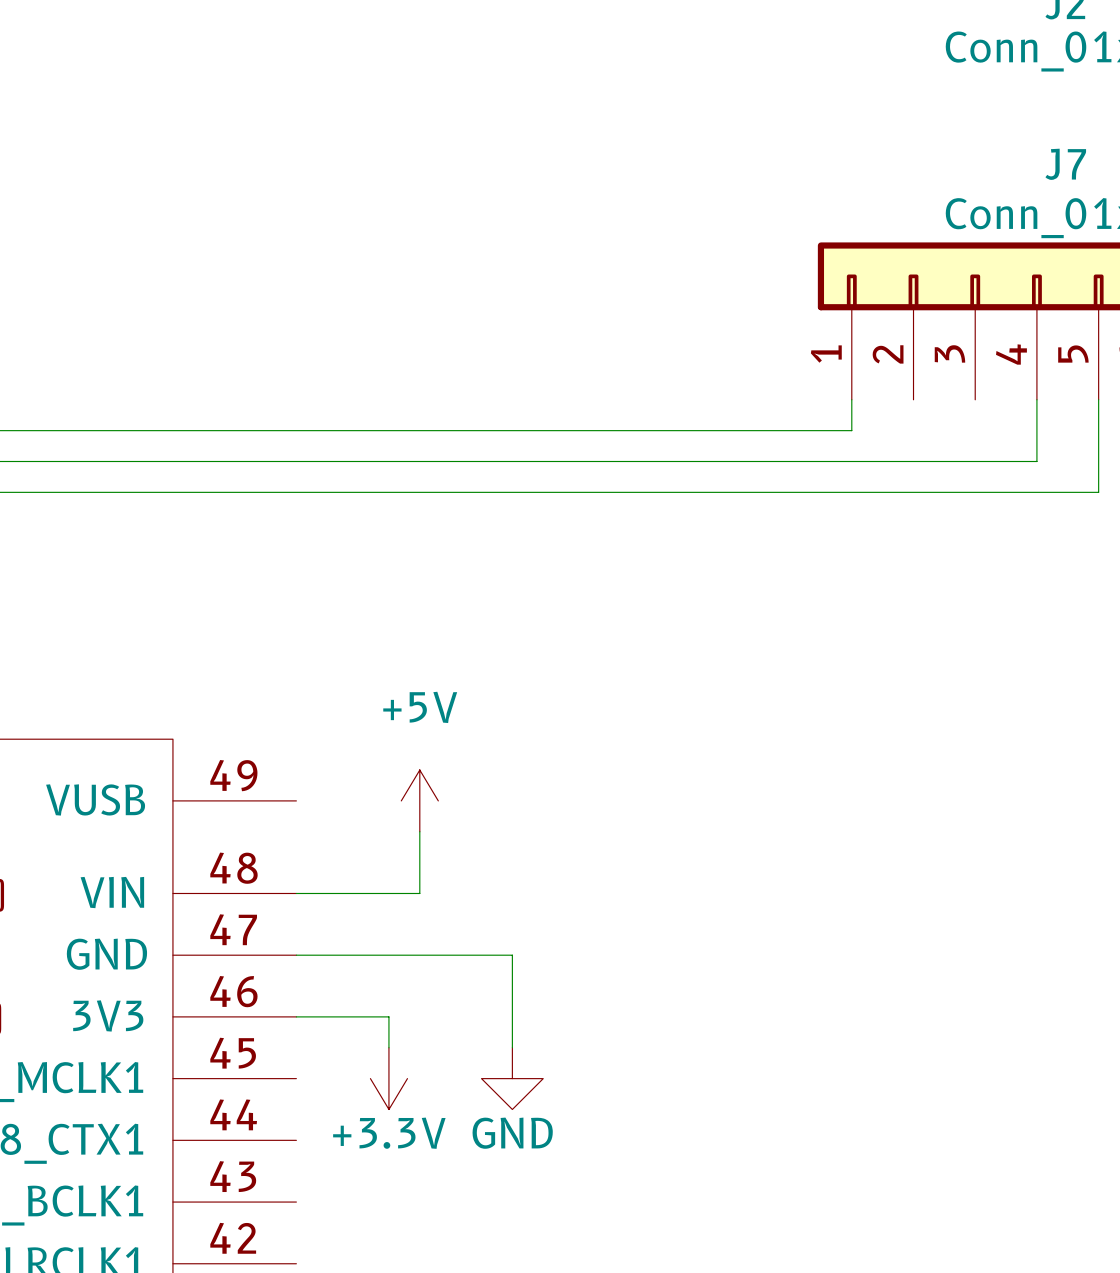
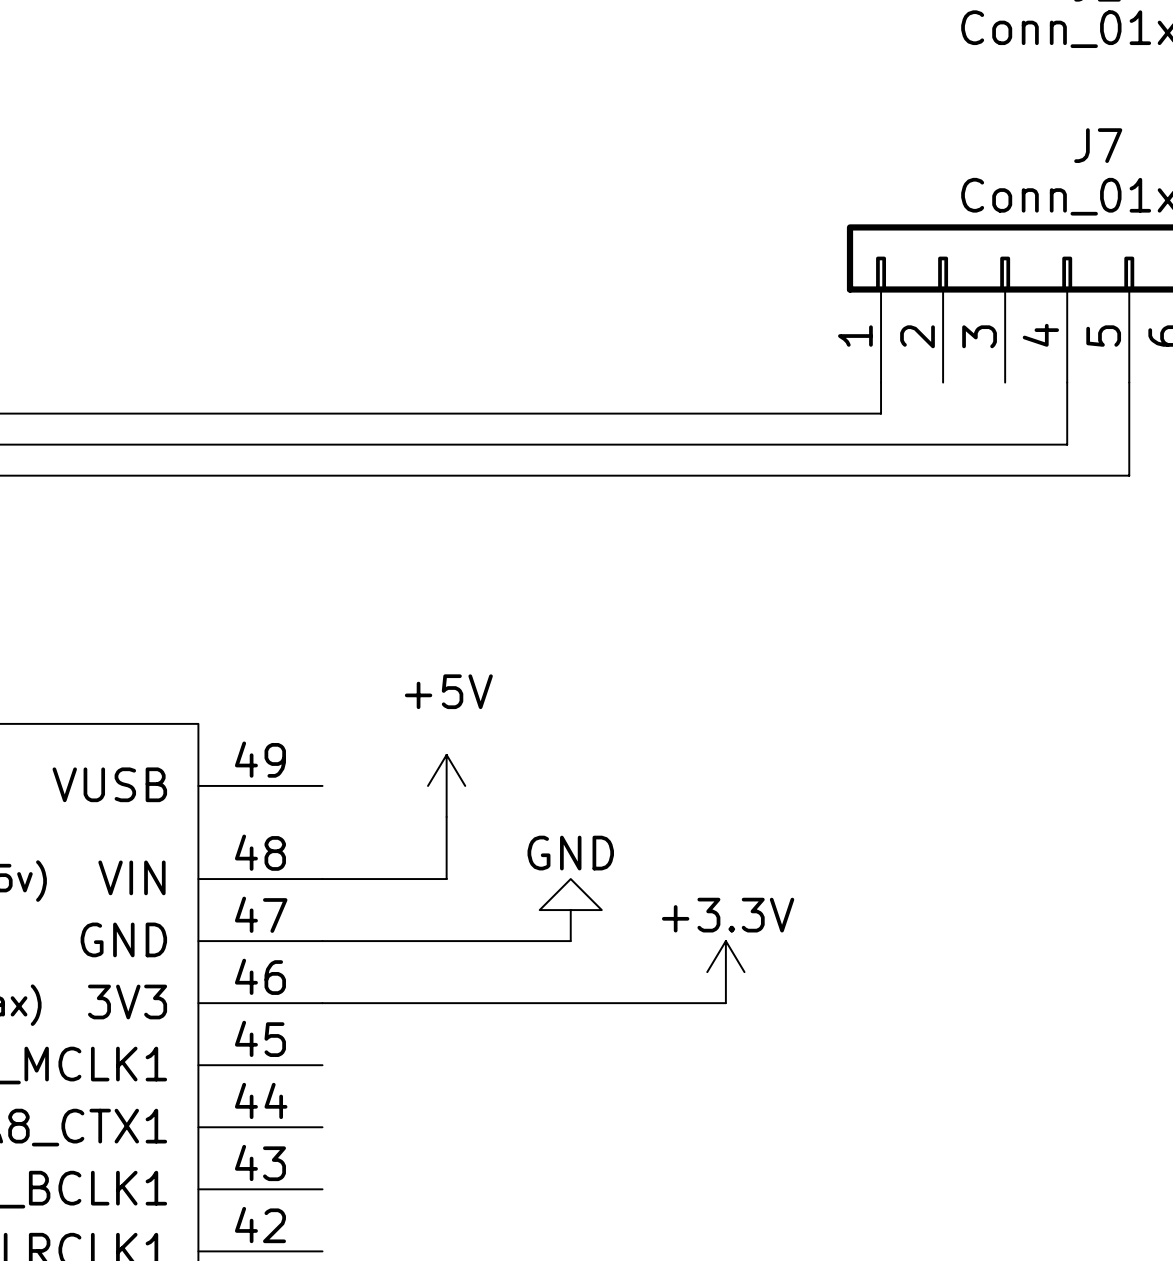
wire: (512, 955) (512, 1047) -> (539, 941) (570, 941)
wire: (388, 1016) (388, 1047) -> (415, 1003) (725, 1003)
power symbol rotation: 0° (388, 1078) -> 180° (725, 972)
power symbol position: +3.3V (388, 1078) -> +3.3V (725, 972)
power symbol rotation: 0° (512, 1078) -> 180° (570, 910)
power symbol position: GND (512, 1078) -> GND (570, 910)

